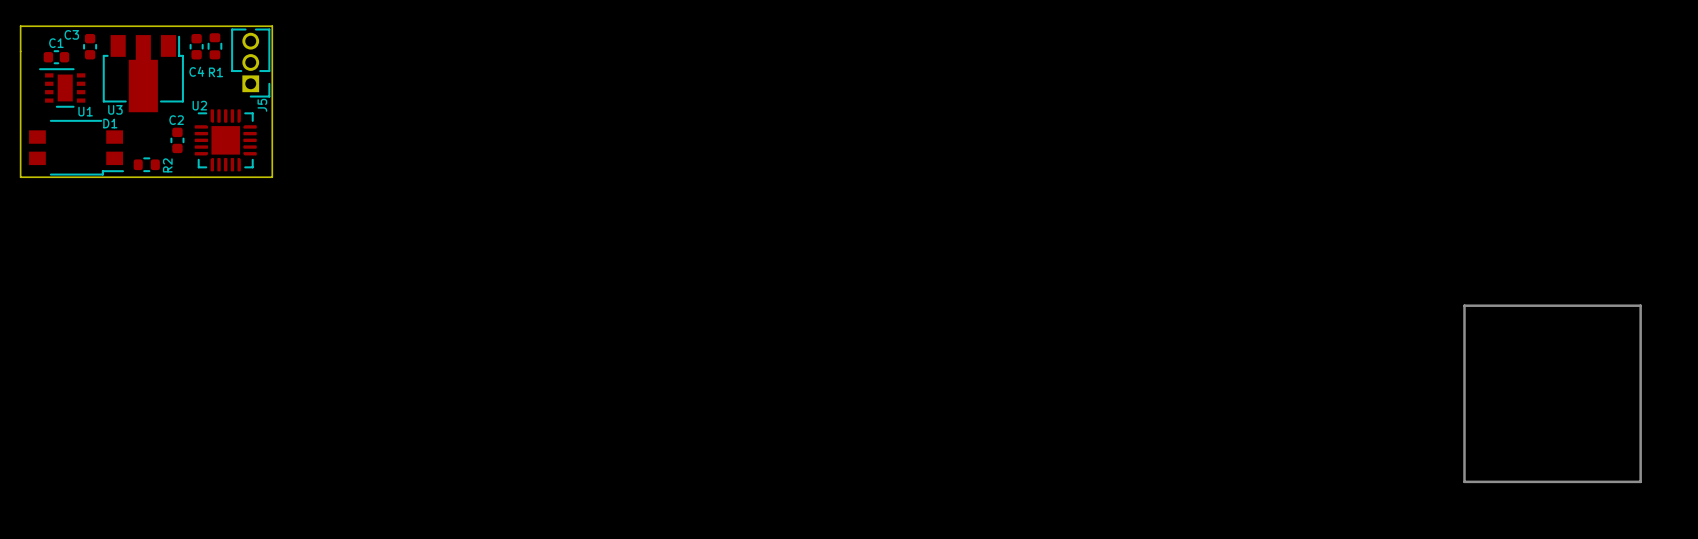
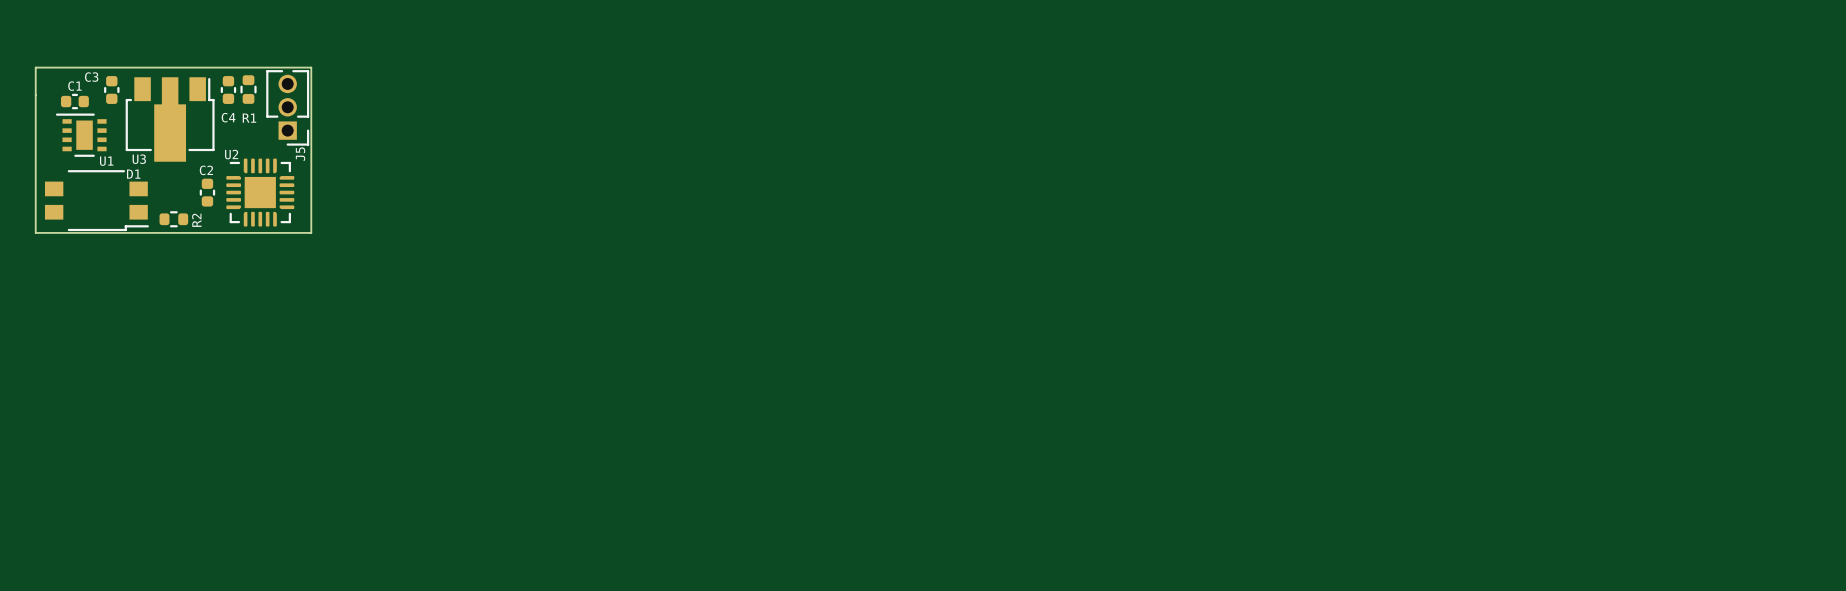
line: (1464, 305) (1640, 305) (1640, 481) (1464, 481) (1464, 305) -> none

